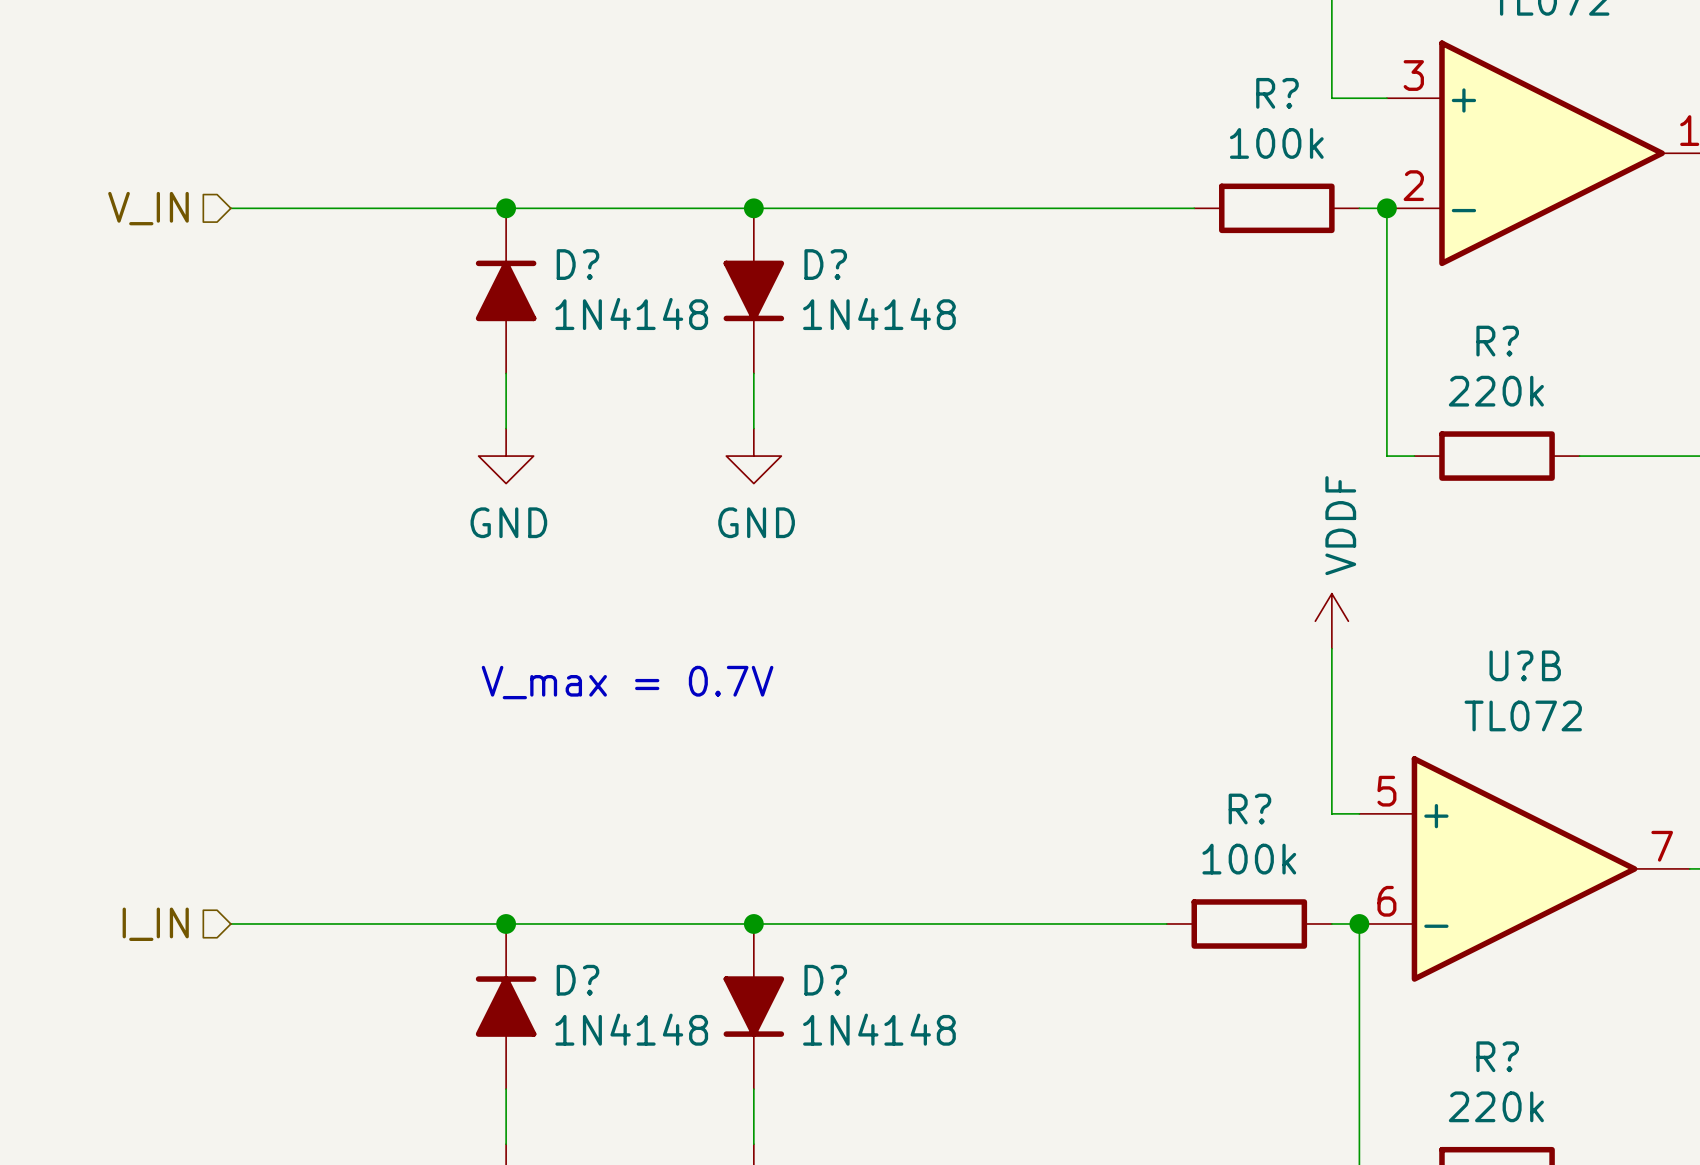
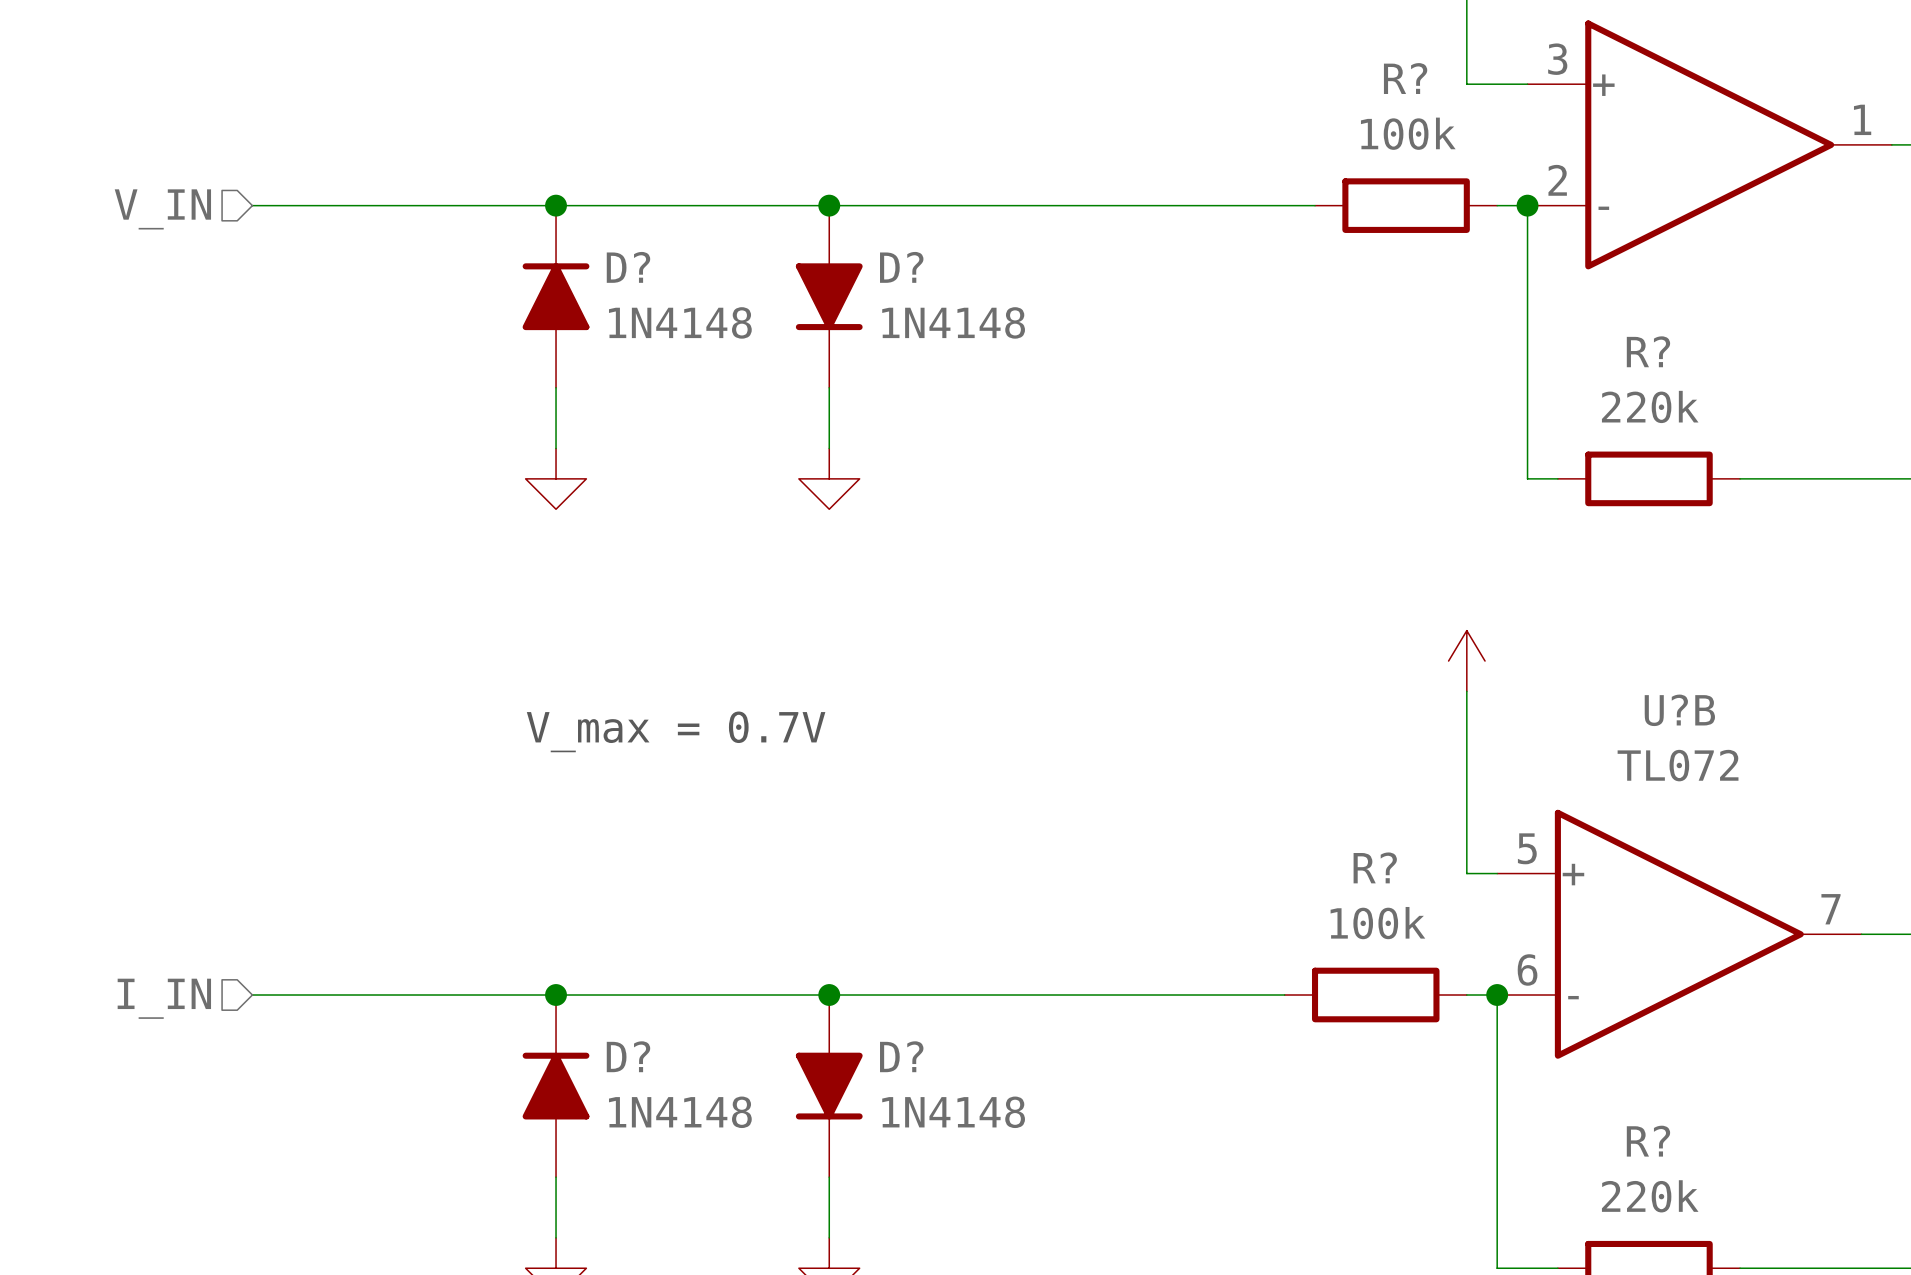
power symbol text: GND (508, 522) -> none
power symbol text: GND (756, 522) -> none
power symbol text: VDDF (1340, 525) -> none

